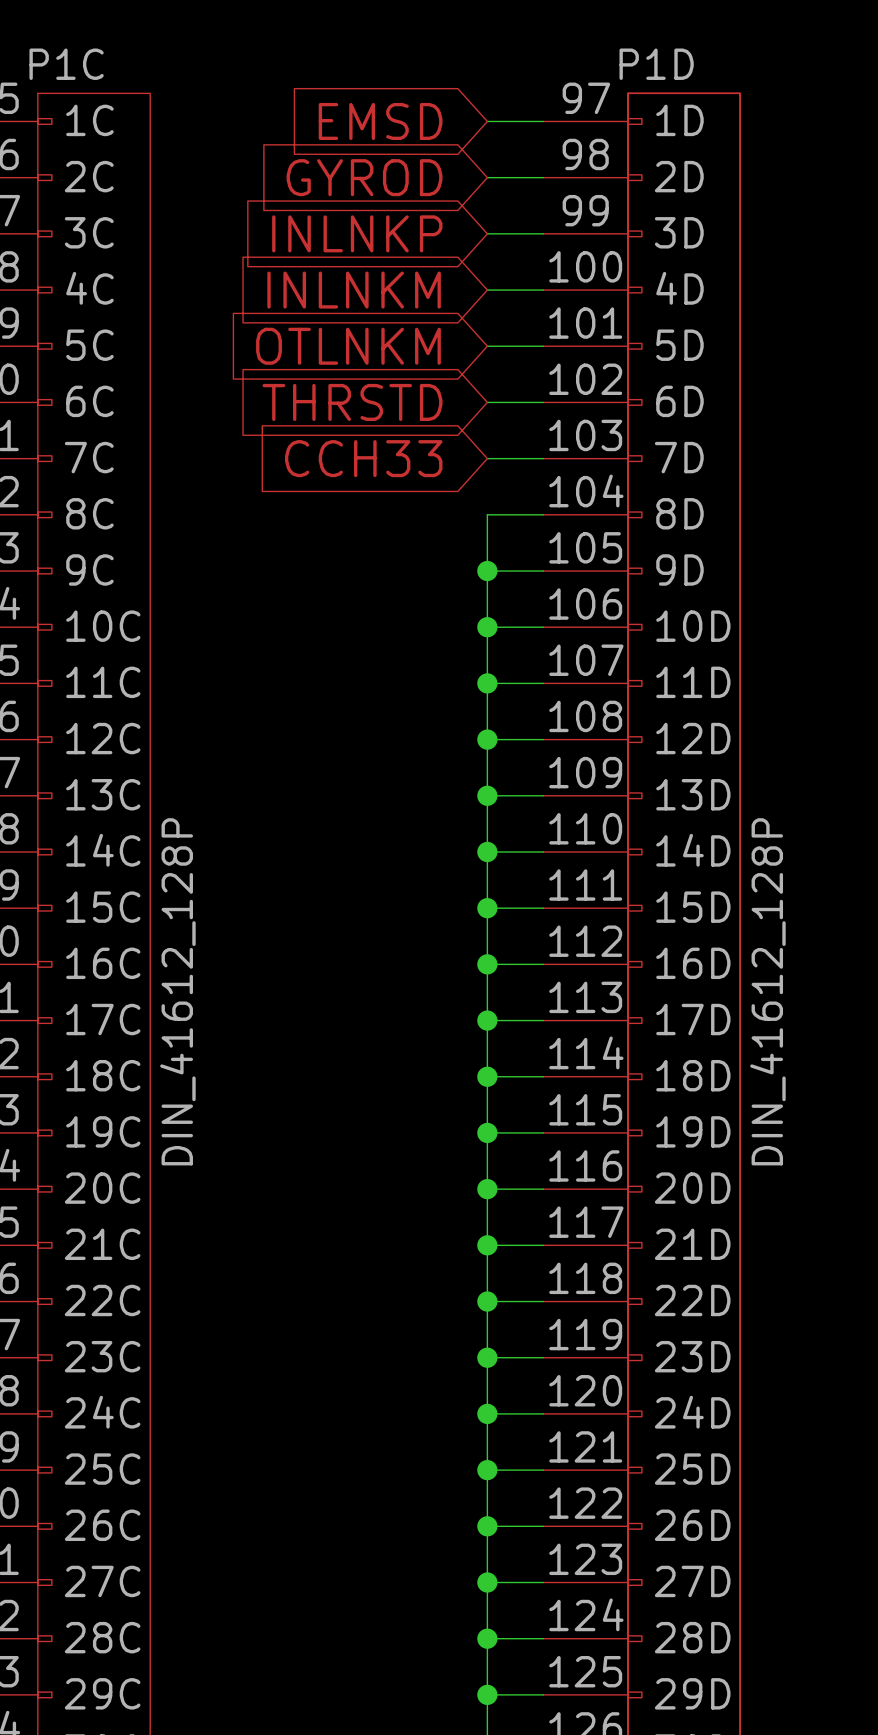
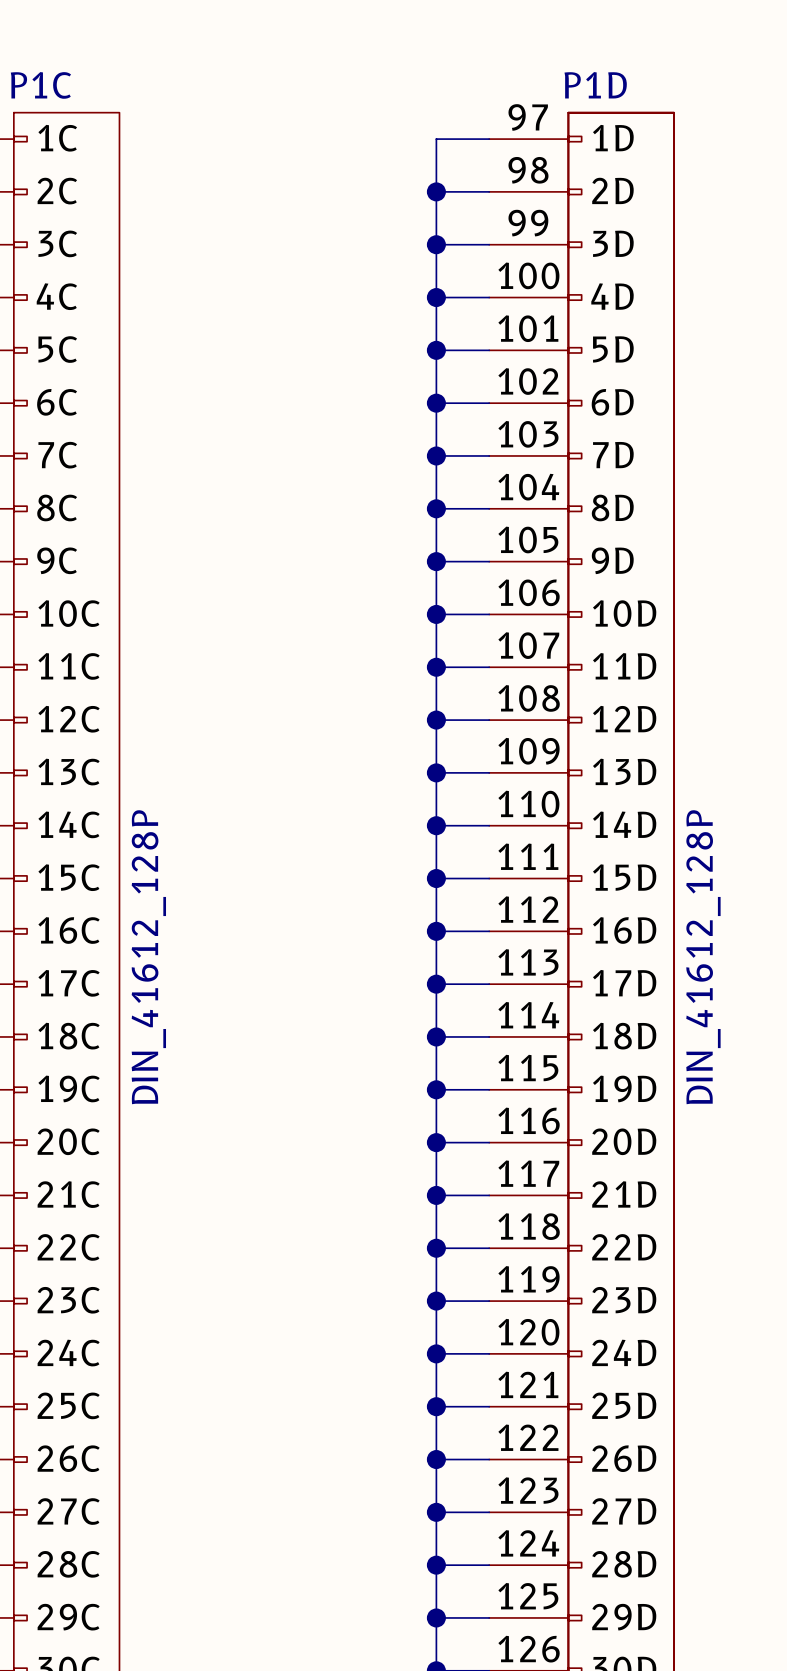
global label: EMSD (380, 121) -> none
wire: none -> (436, 139) (436, 508)
global label: GYROD (364, 177) -> none
junction: none -> (436, 191)
global label: INLNKP (357, 233) -> none
junction: none -> (436, 244)
global label: INLNKM (354, 290) -> none
junction: none -> (436, 297)
global label: OTLNKM (348, 346) -> none
junction: none -> (436, 350)
global label: THRSTD (352, 402) -> none
junction: none -> (436, 403)
global label: CCH33 (363, 458) -> none
junction: none -> (436, 455)
junction: none -> (436, 508)

